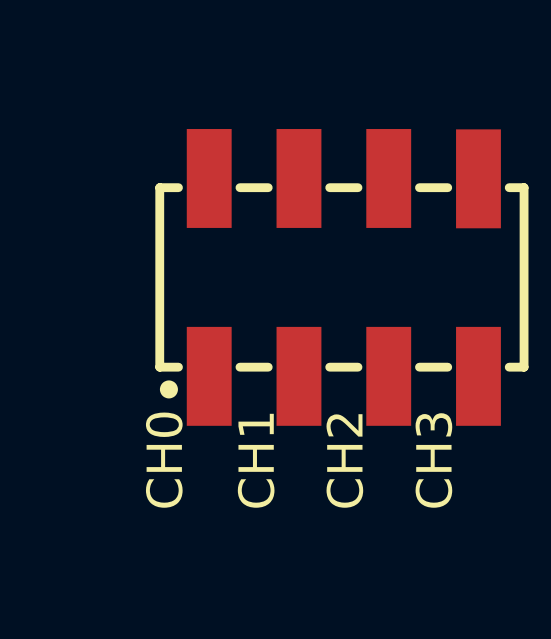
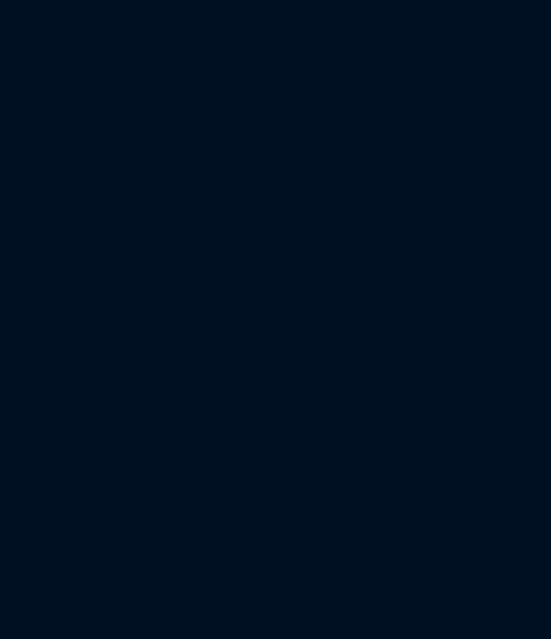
part: (341, 277) -> none
text: CH0 (164, 460) -> none
text: CH1 (256, 460) -> none
text: CH2 (344, 460) -> none
text: CH3 (433, 460) -> none

